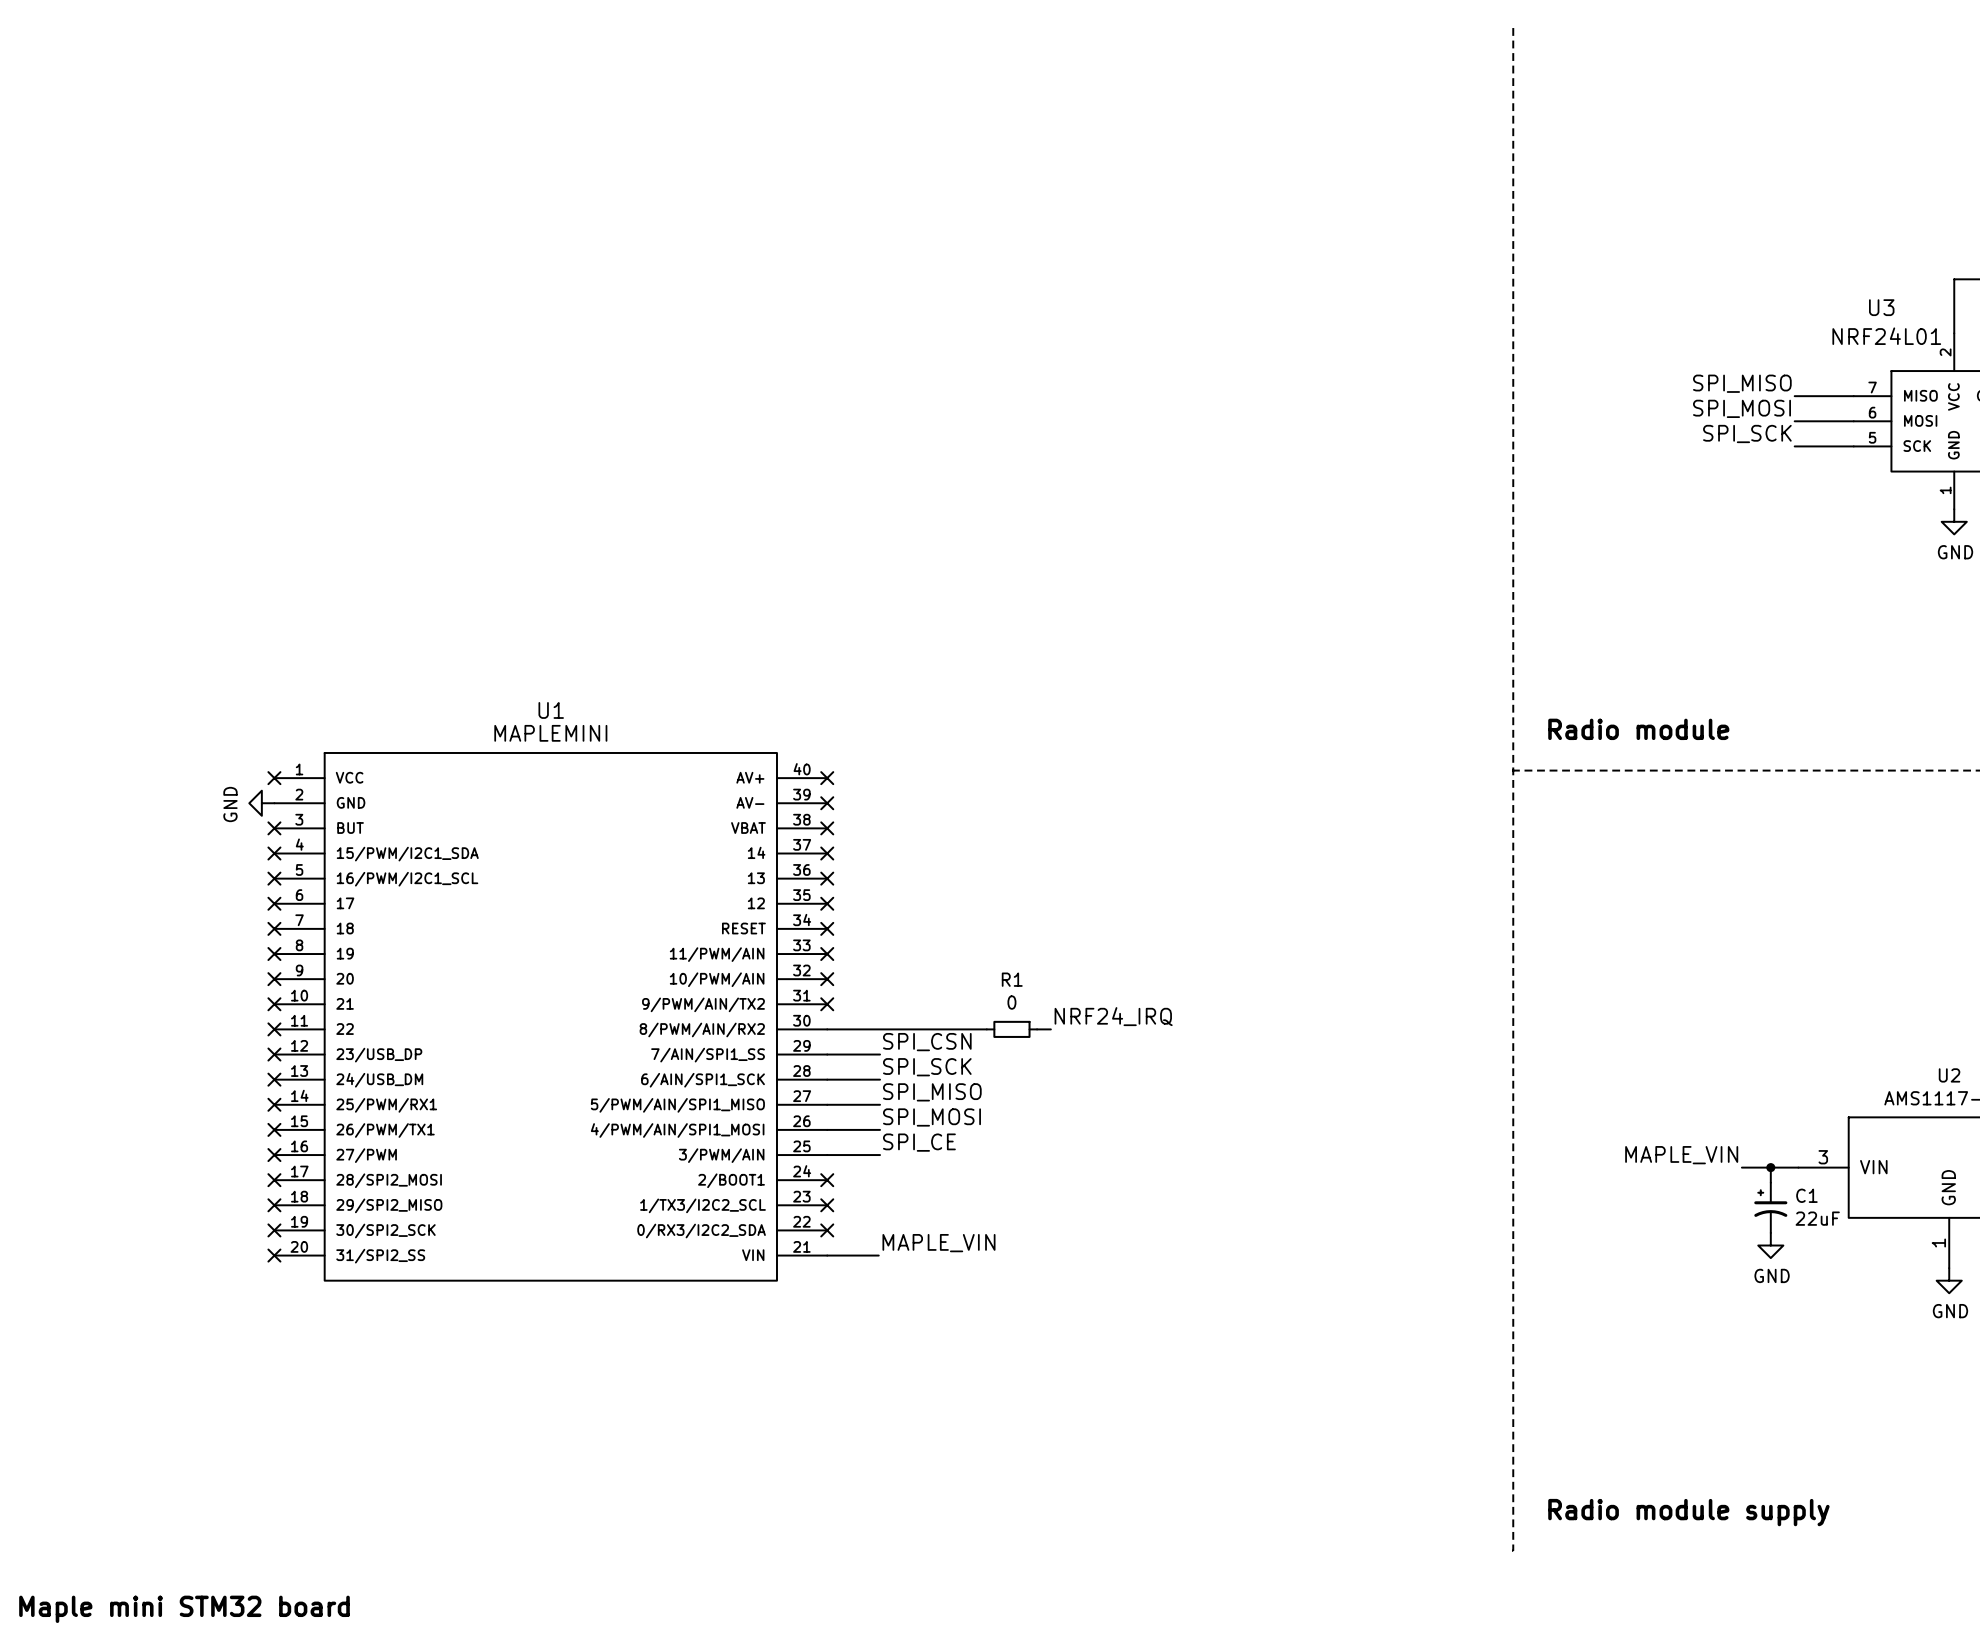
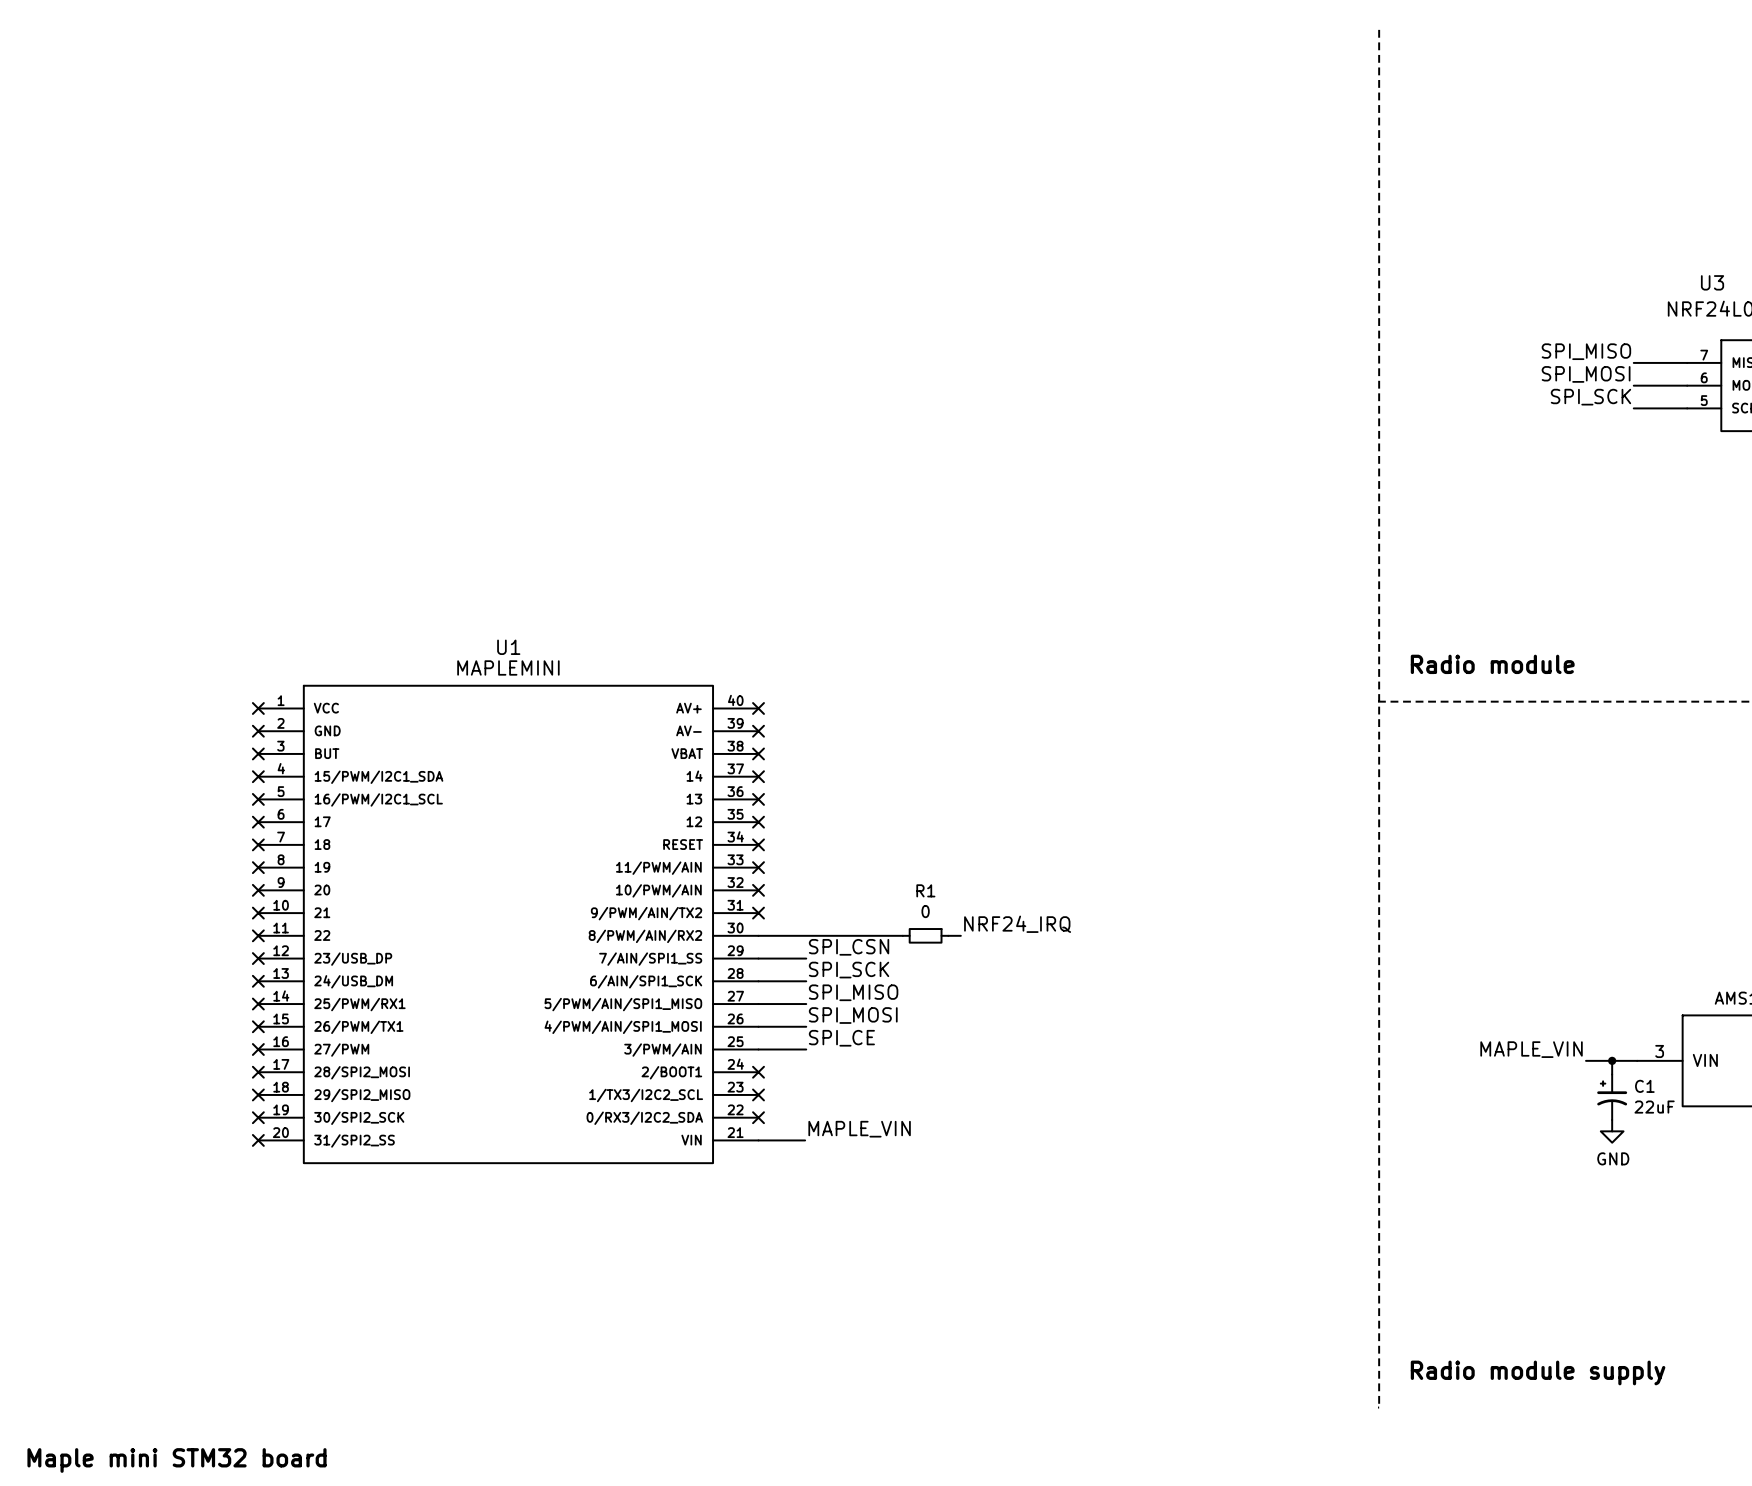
power symbol: GND (261, 803) -> none
no-connect mark: none -> (258, 731)

